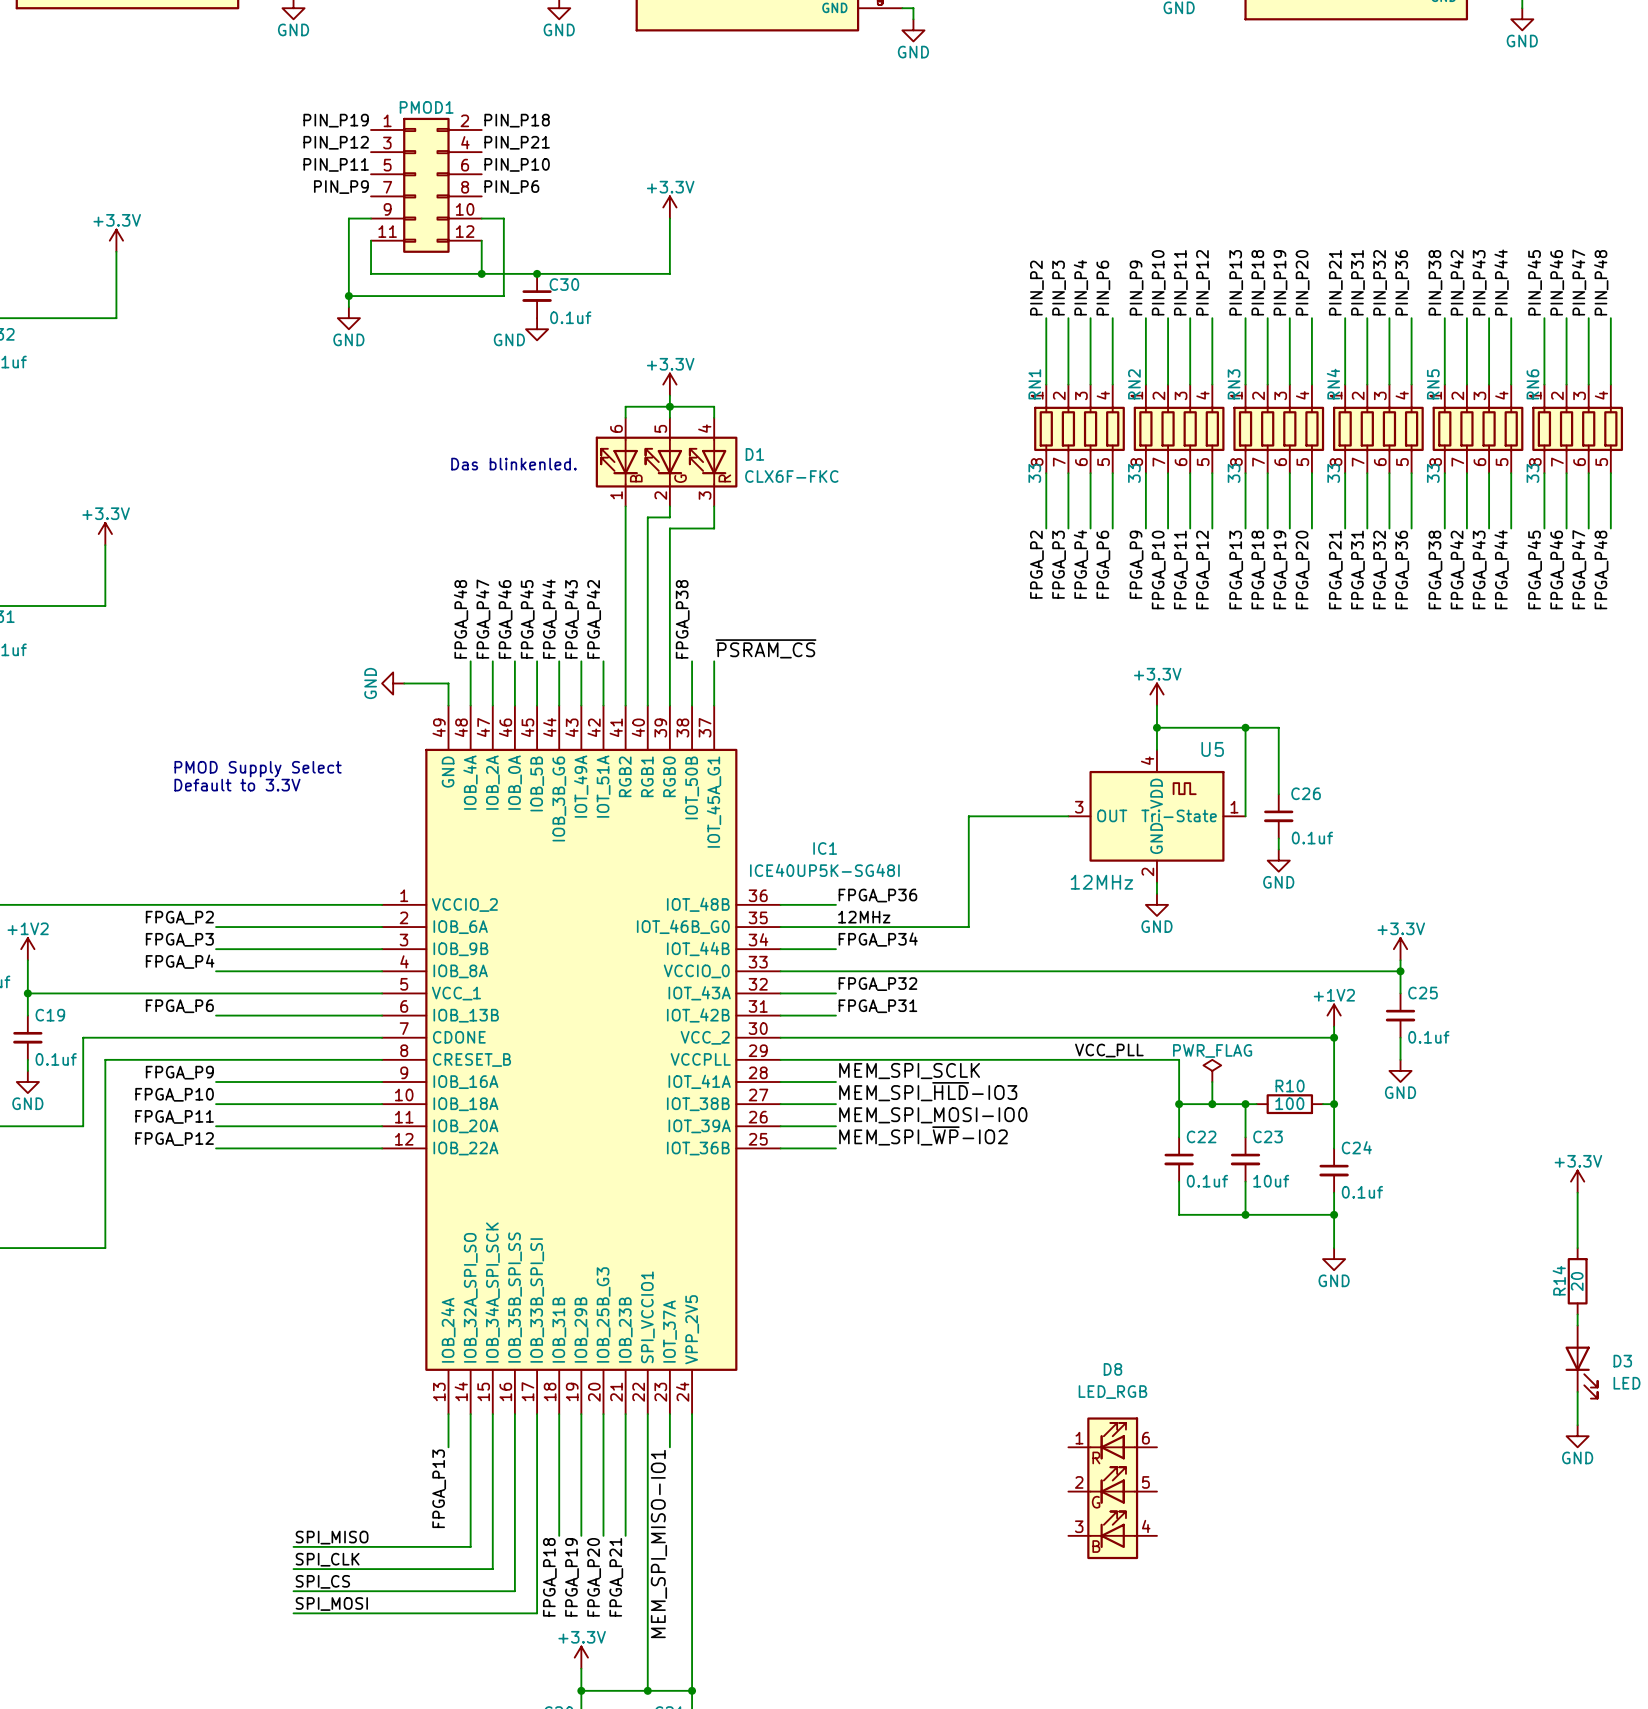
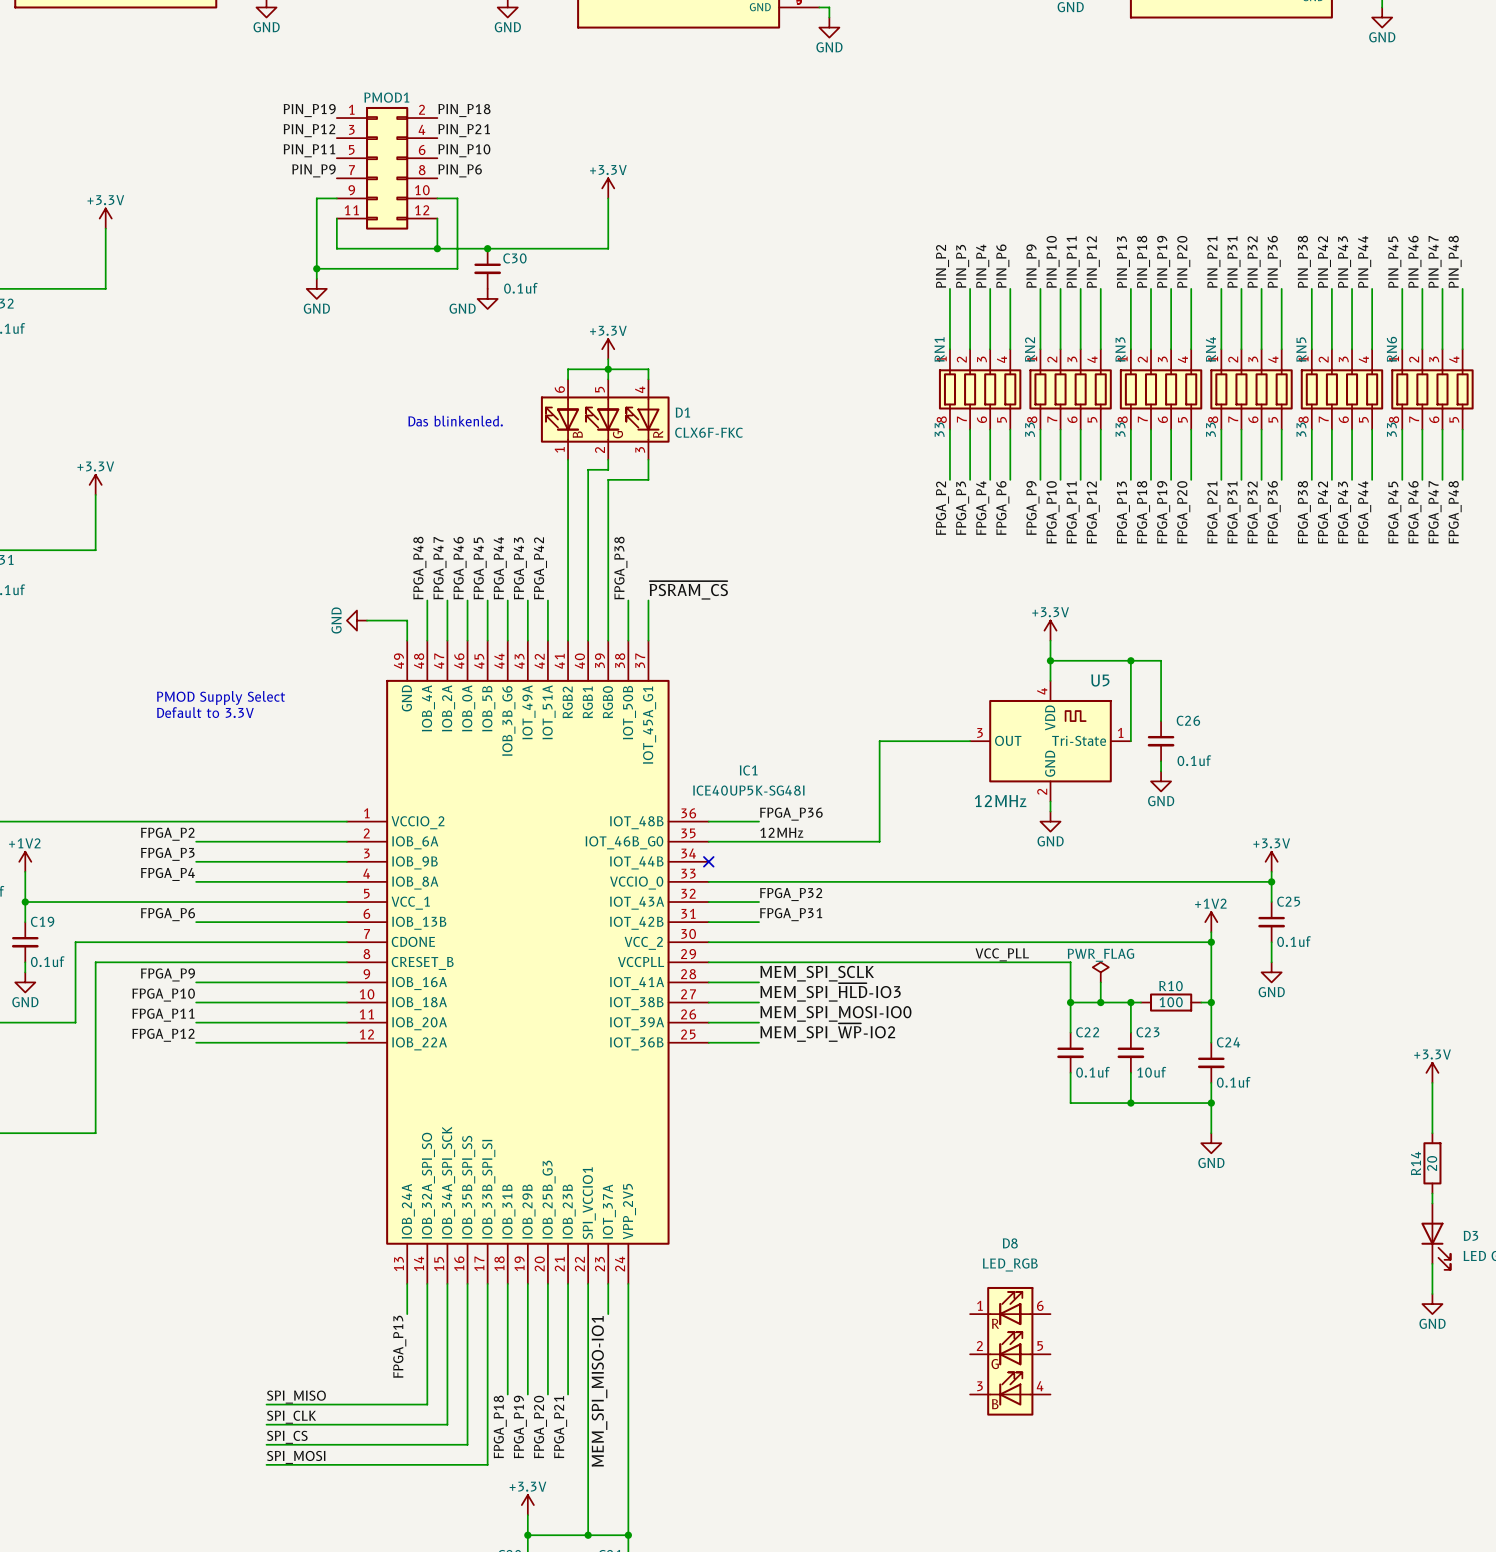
label: FPGA_P34 (878, 939) -> none
wire: (780, 949) (835, 949) -> none
no-connect mark: none -> (708, 861)

